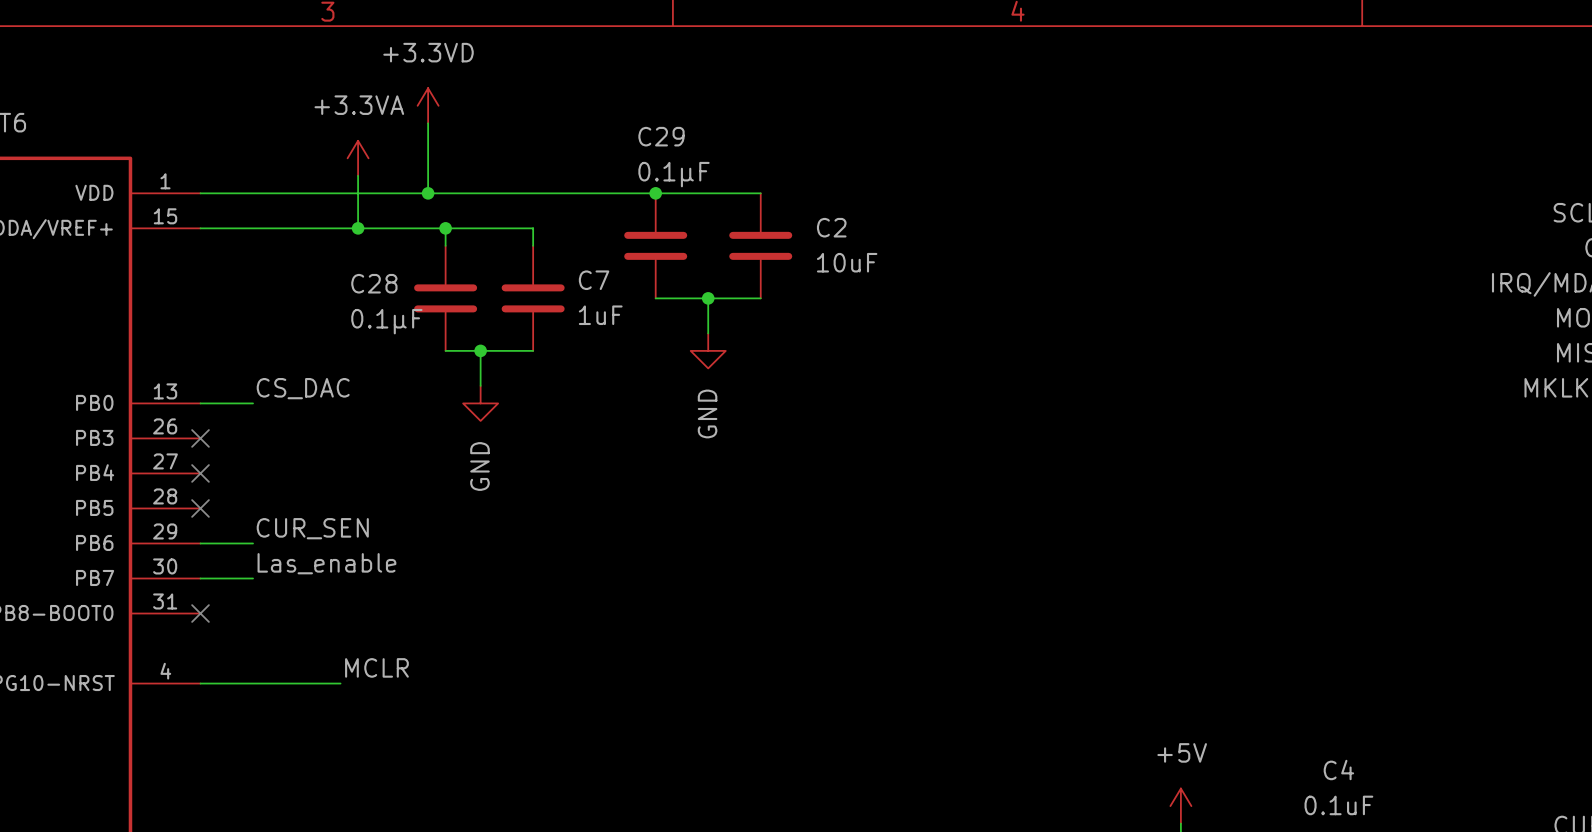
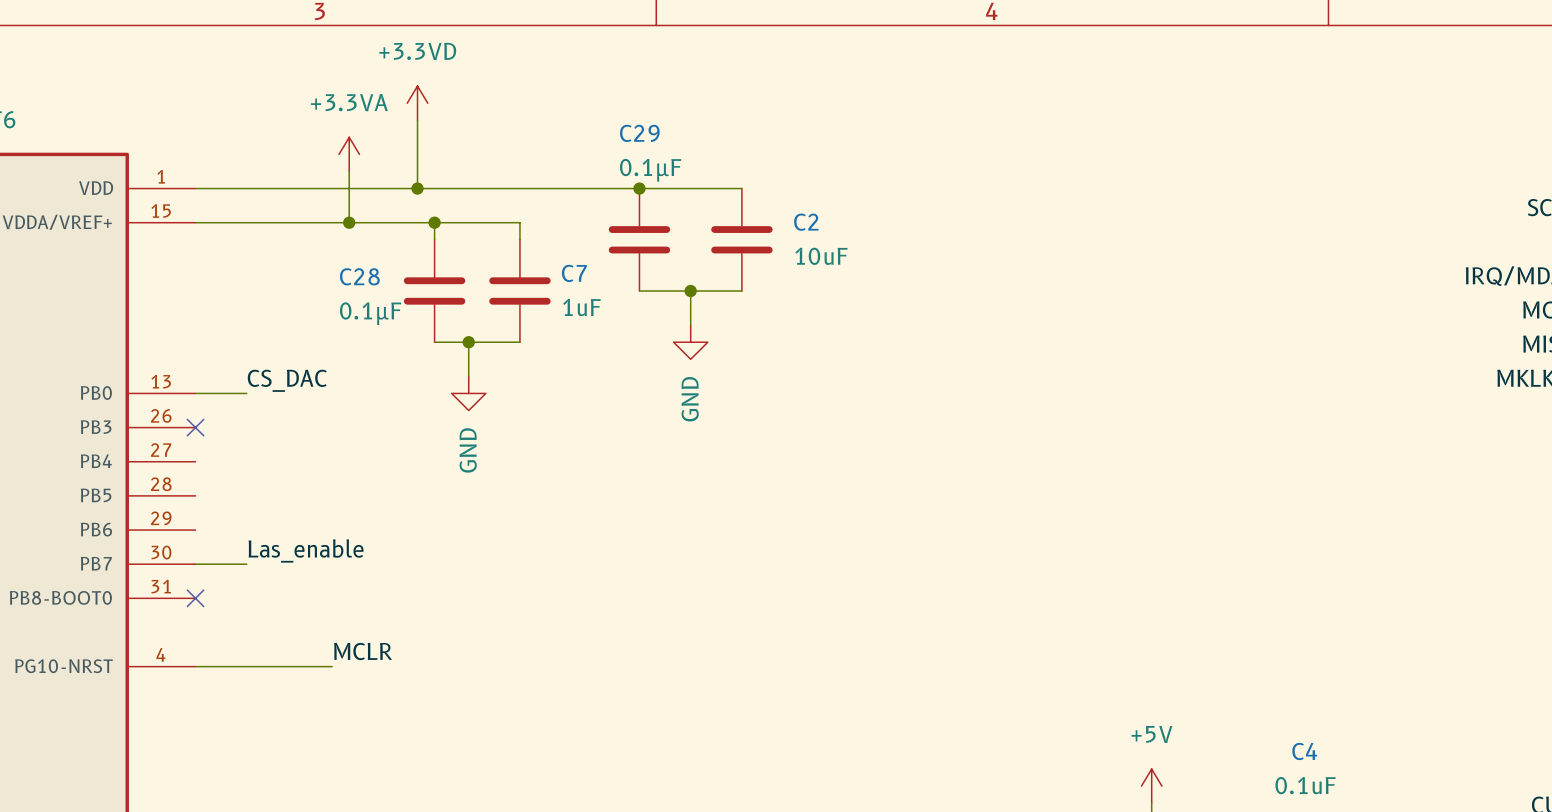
no-connect mark: (200, 473) -> none
no-connect mark: (200, 508) -> none
label: CUR_SEN (312, 528) -> none
wire: (200, 543) (253, 543) -> none

